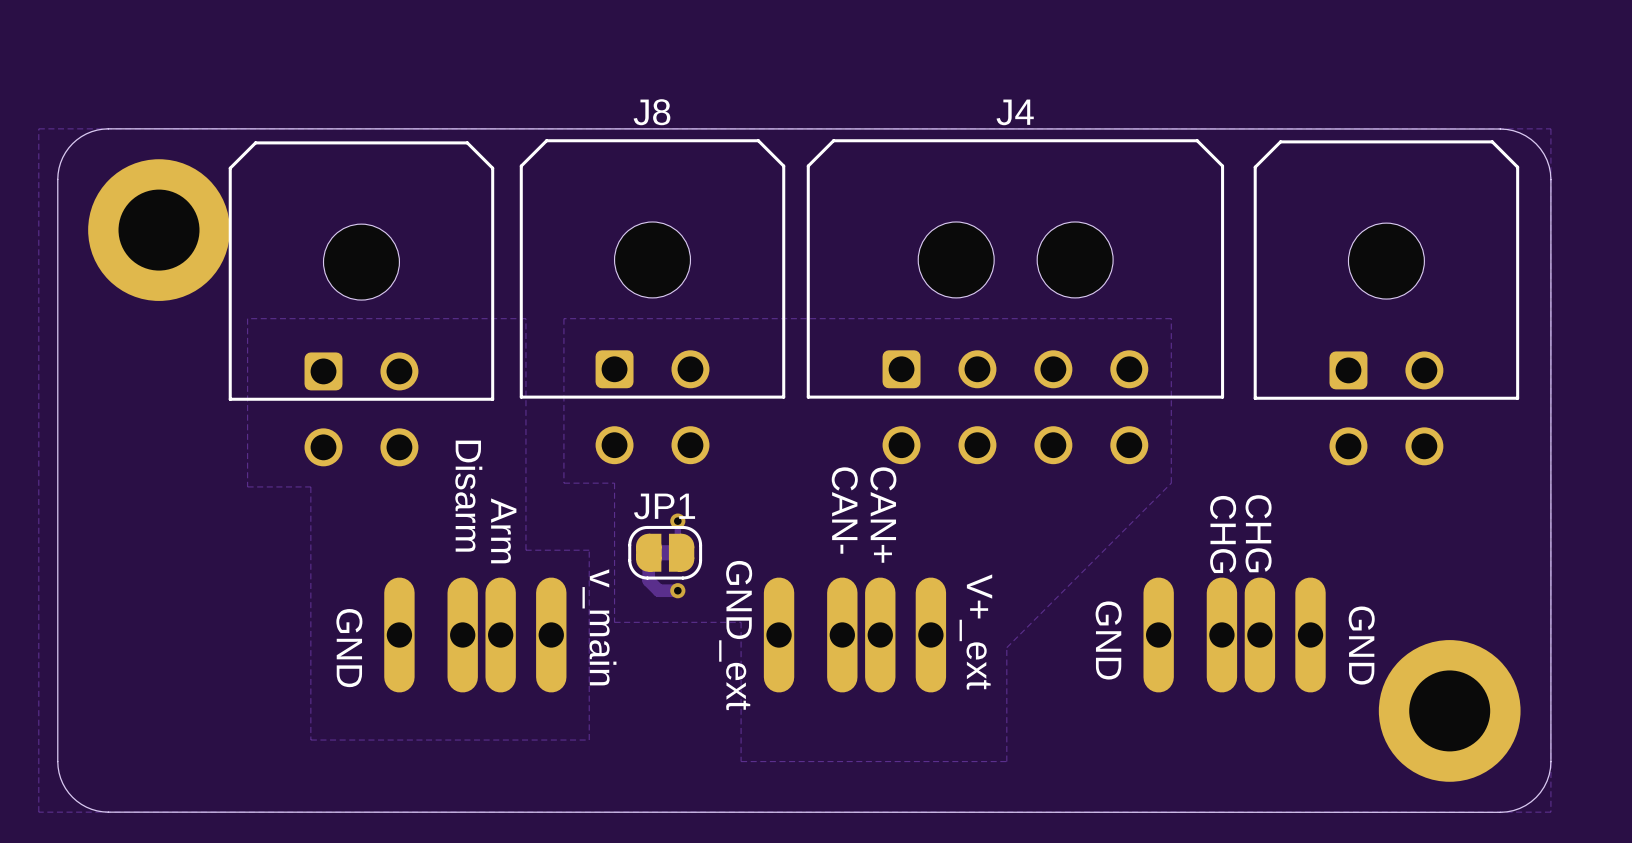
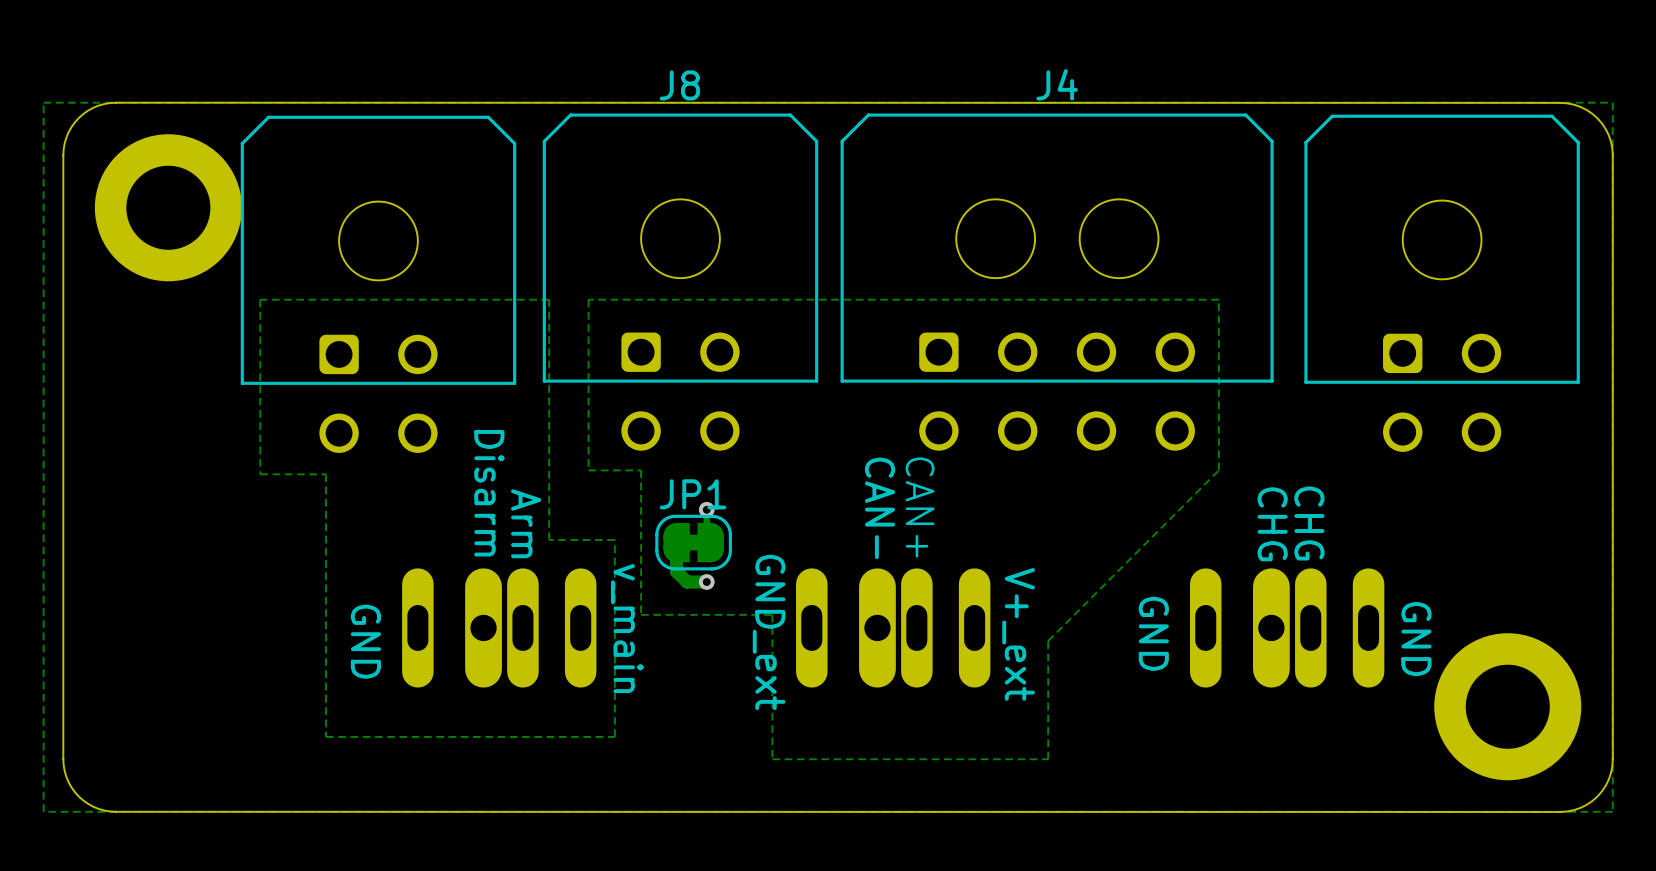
part footprint: [384, 577, 567, 693] -> [402, 568, 597, 688]
part footprint: [763, 577, 947, 693] -> [796, 568, 991, 688]
part footprint: [1143, 577, 1326, 693] -> [1189, 568, 1385, 688]

